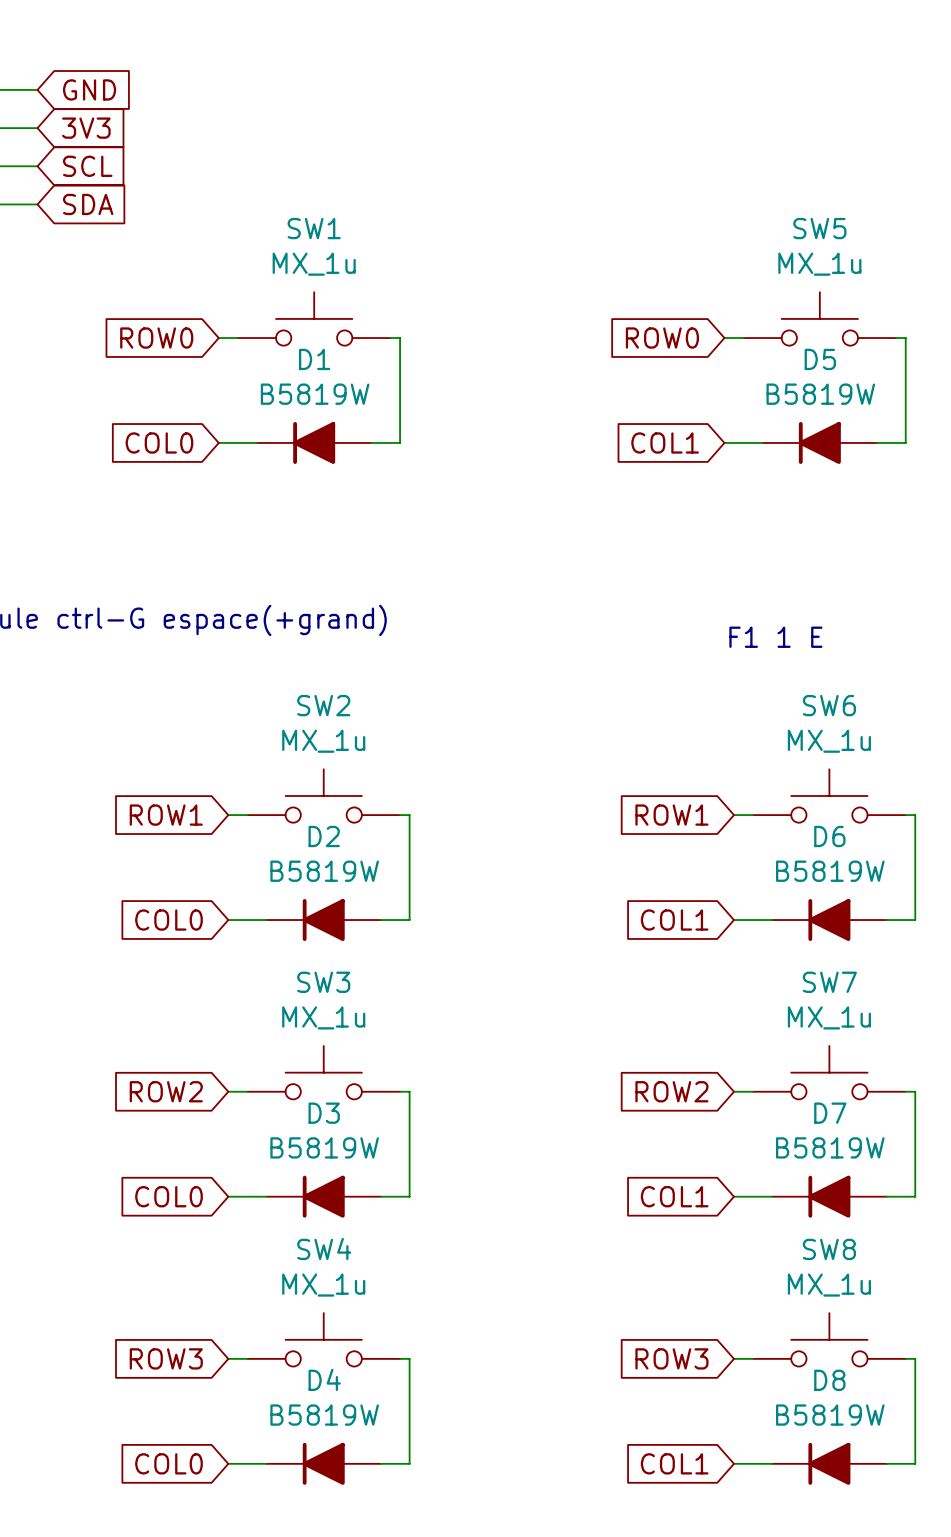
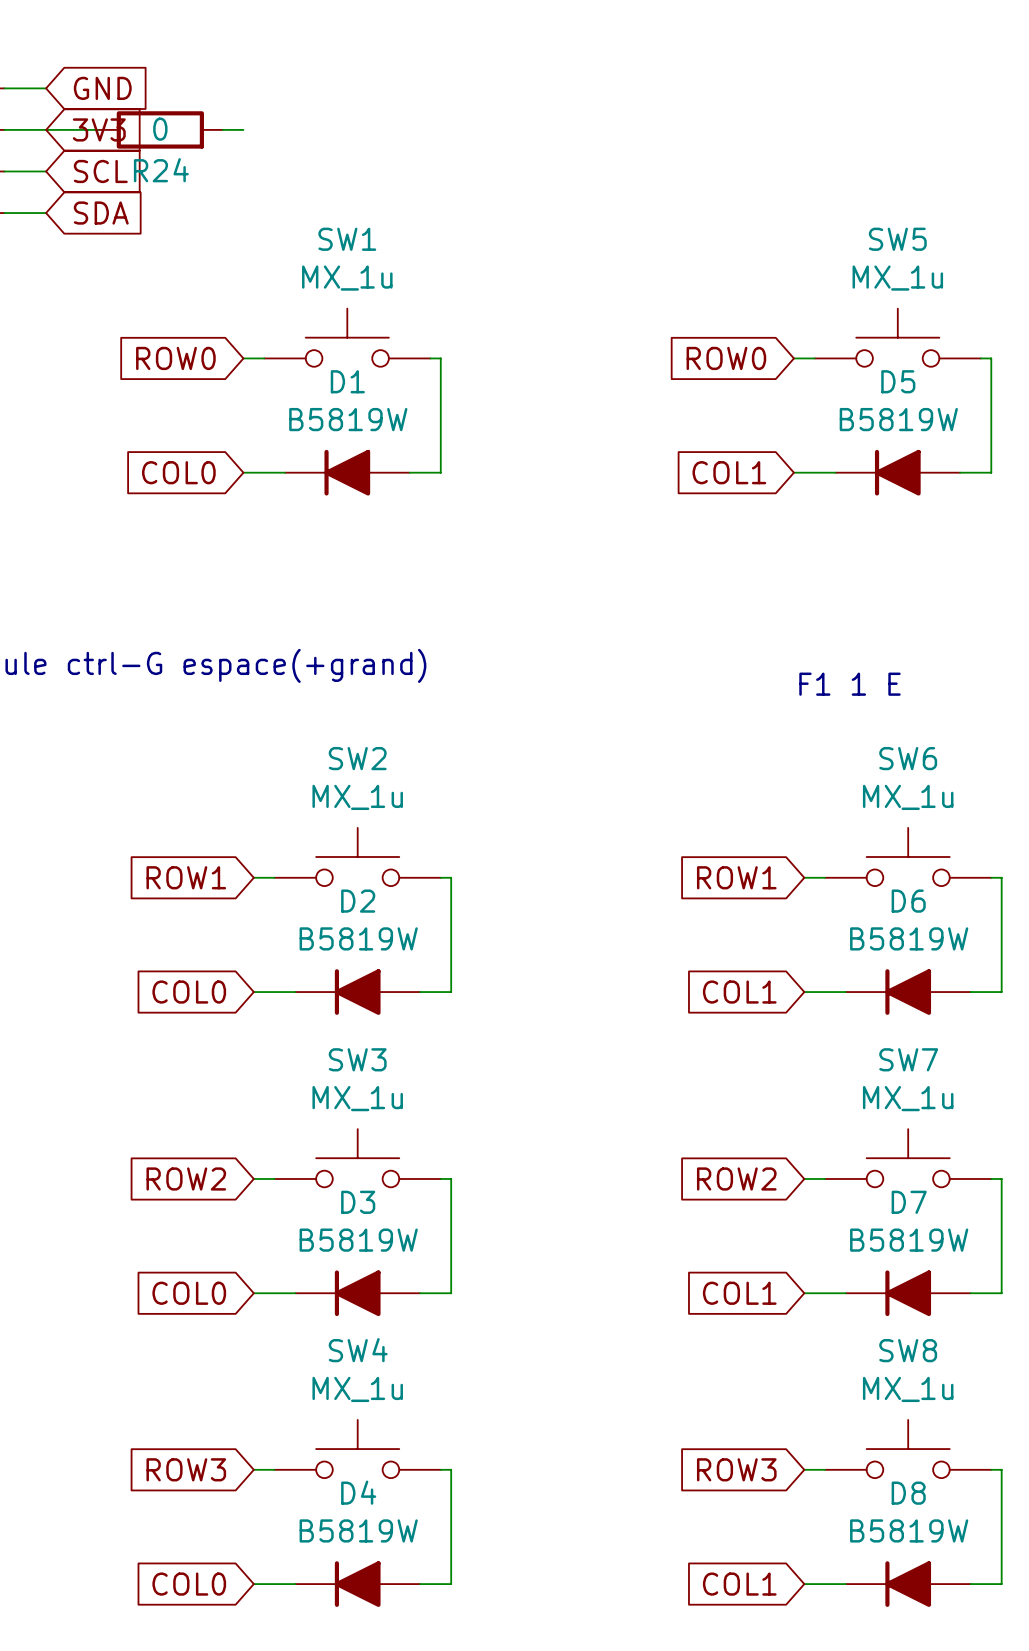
wire: none -> (46, 129) (98, 129)
R24: none -> 0 (160, 129)
wire: none -> (222, 129) (243, 129)

